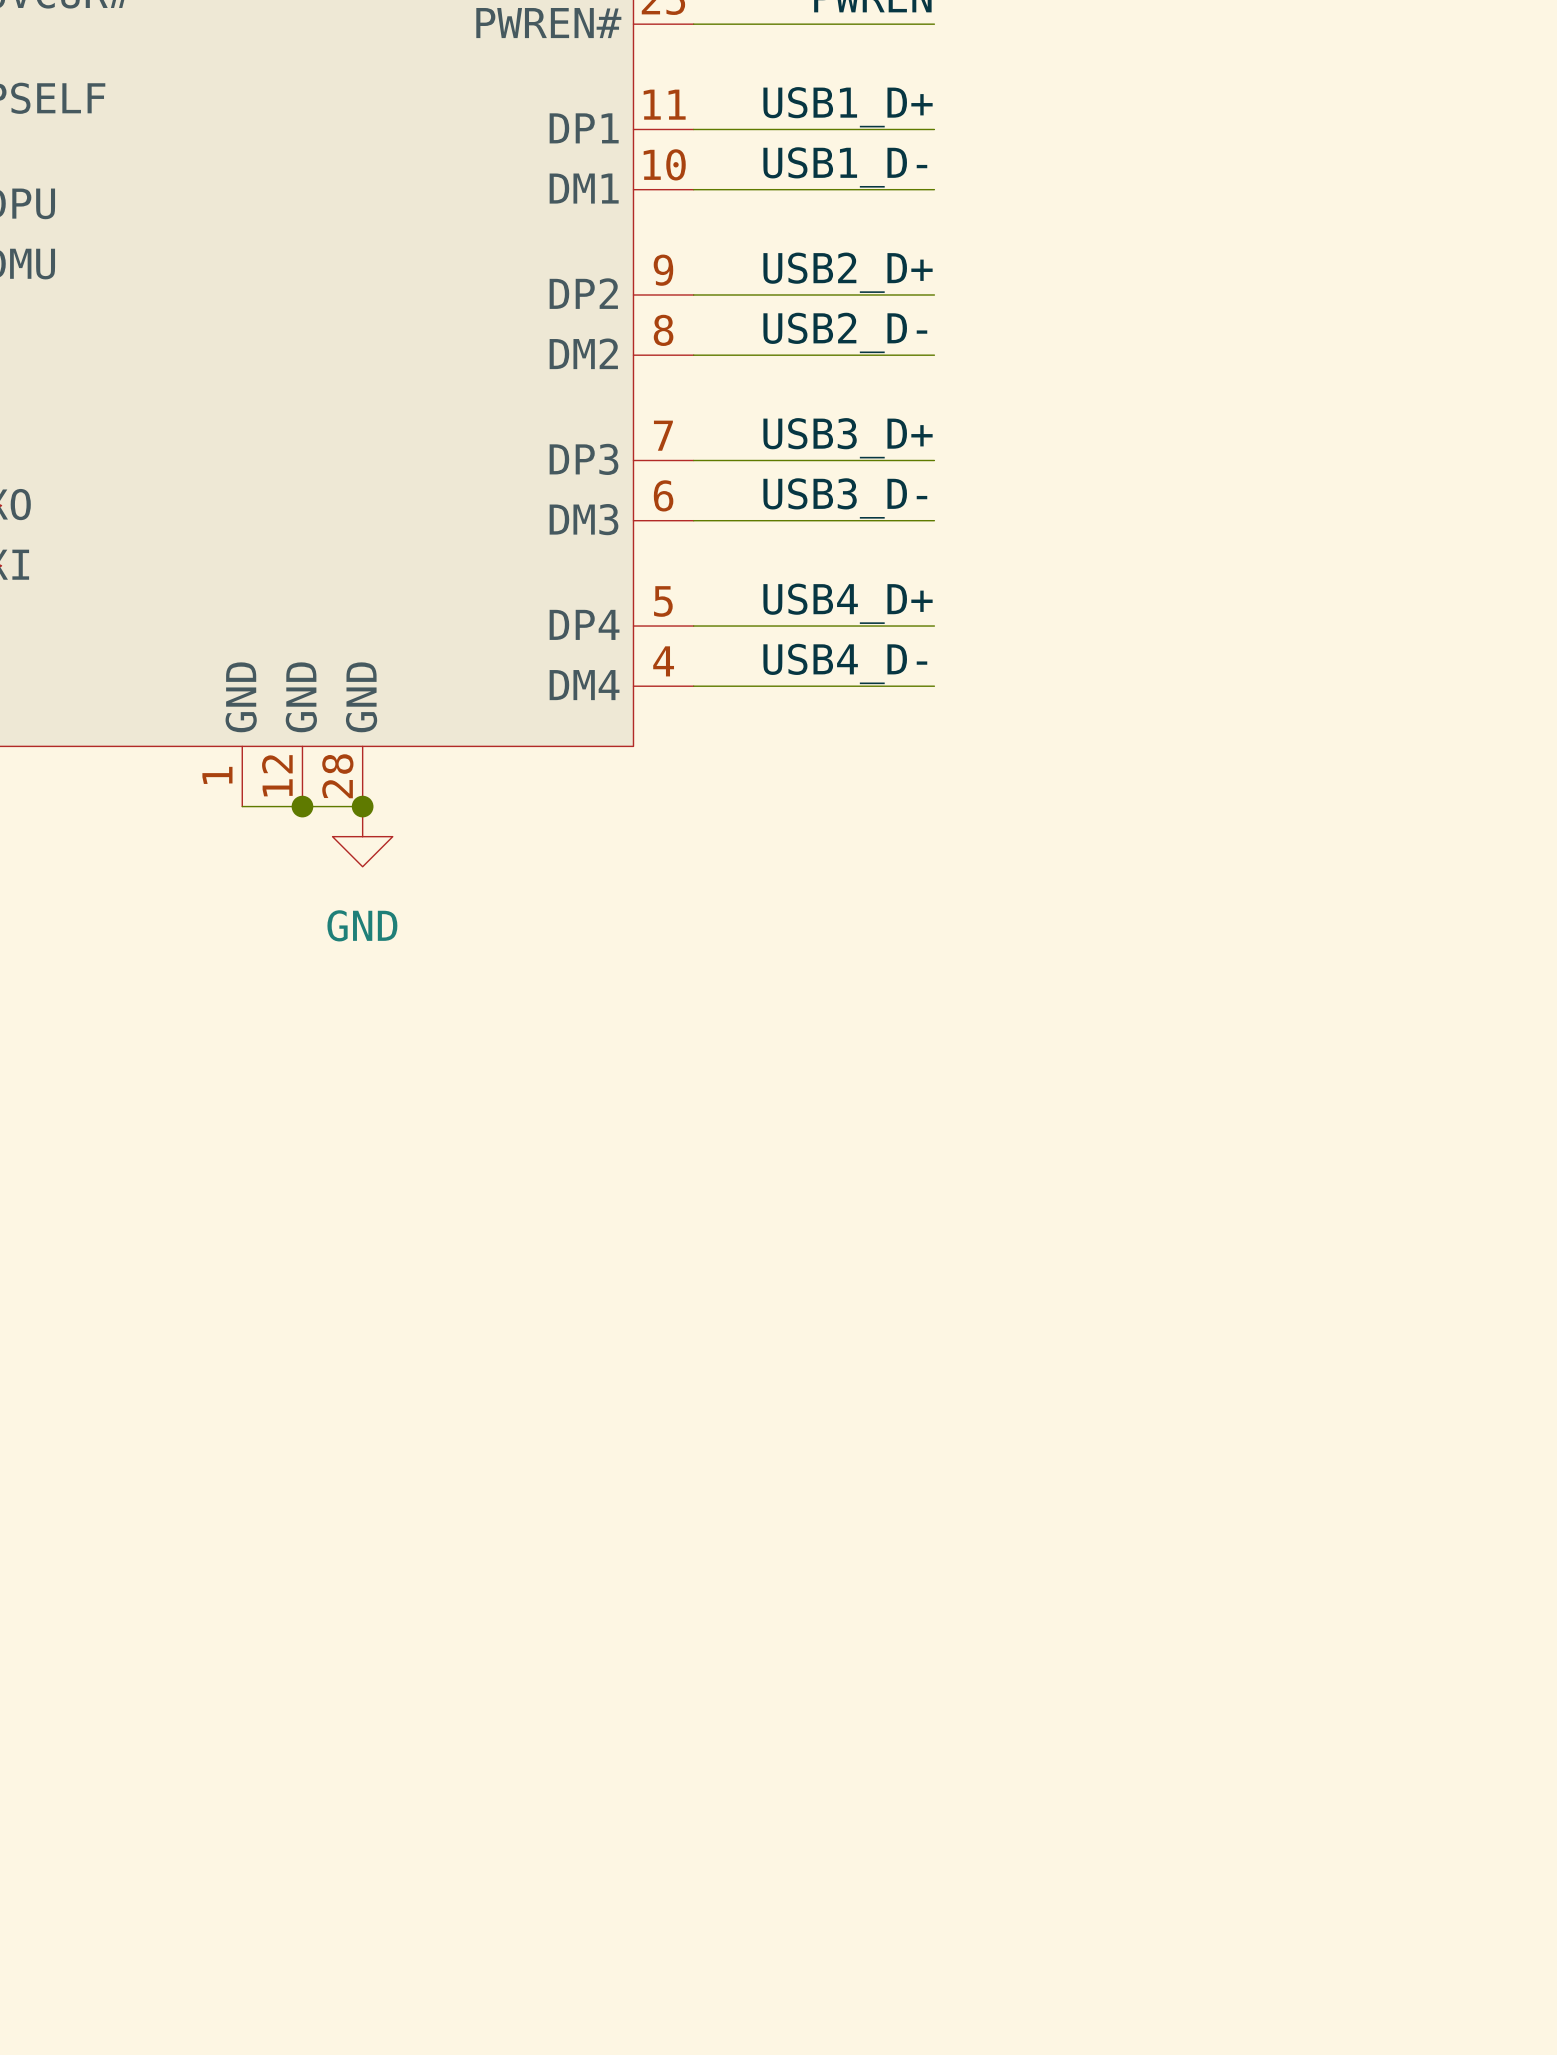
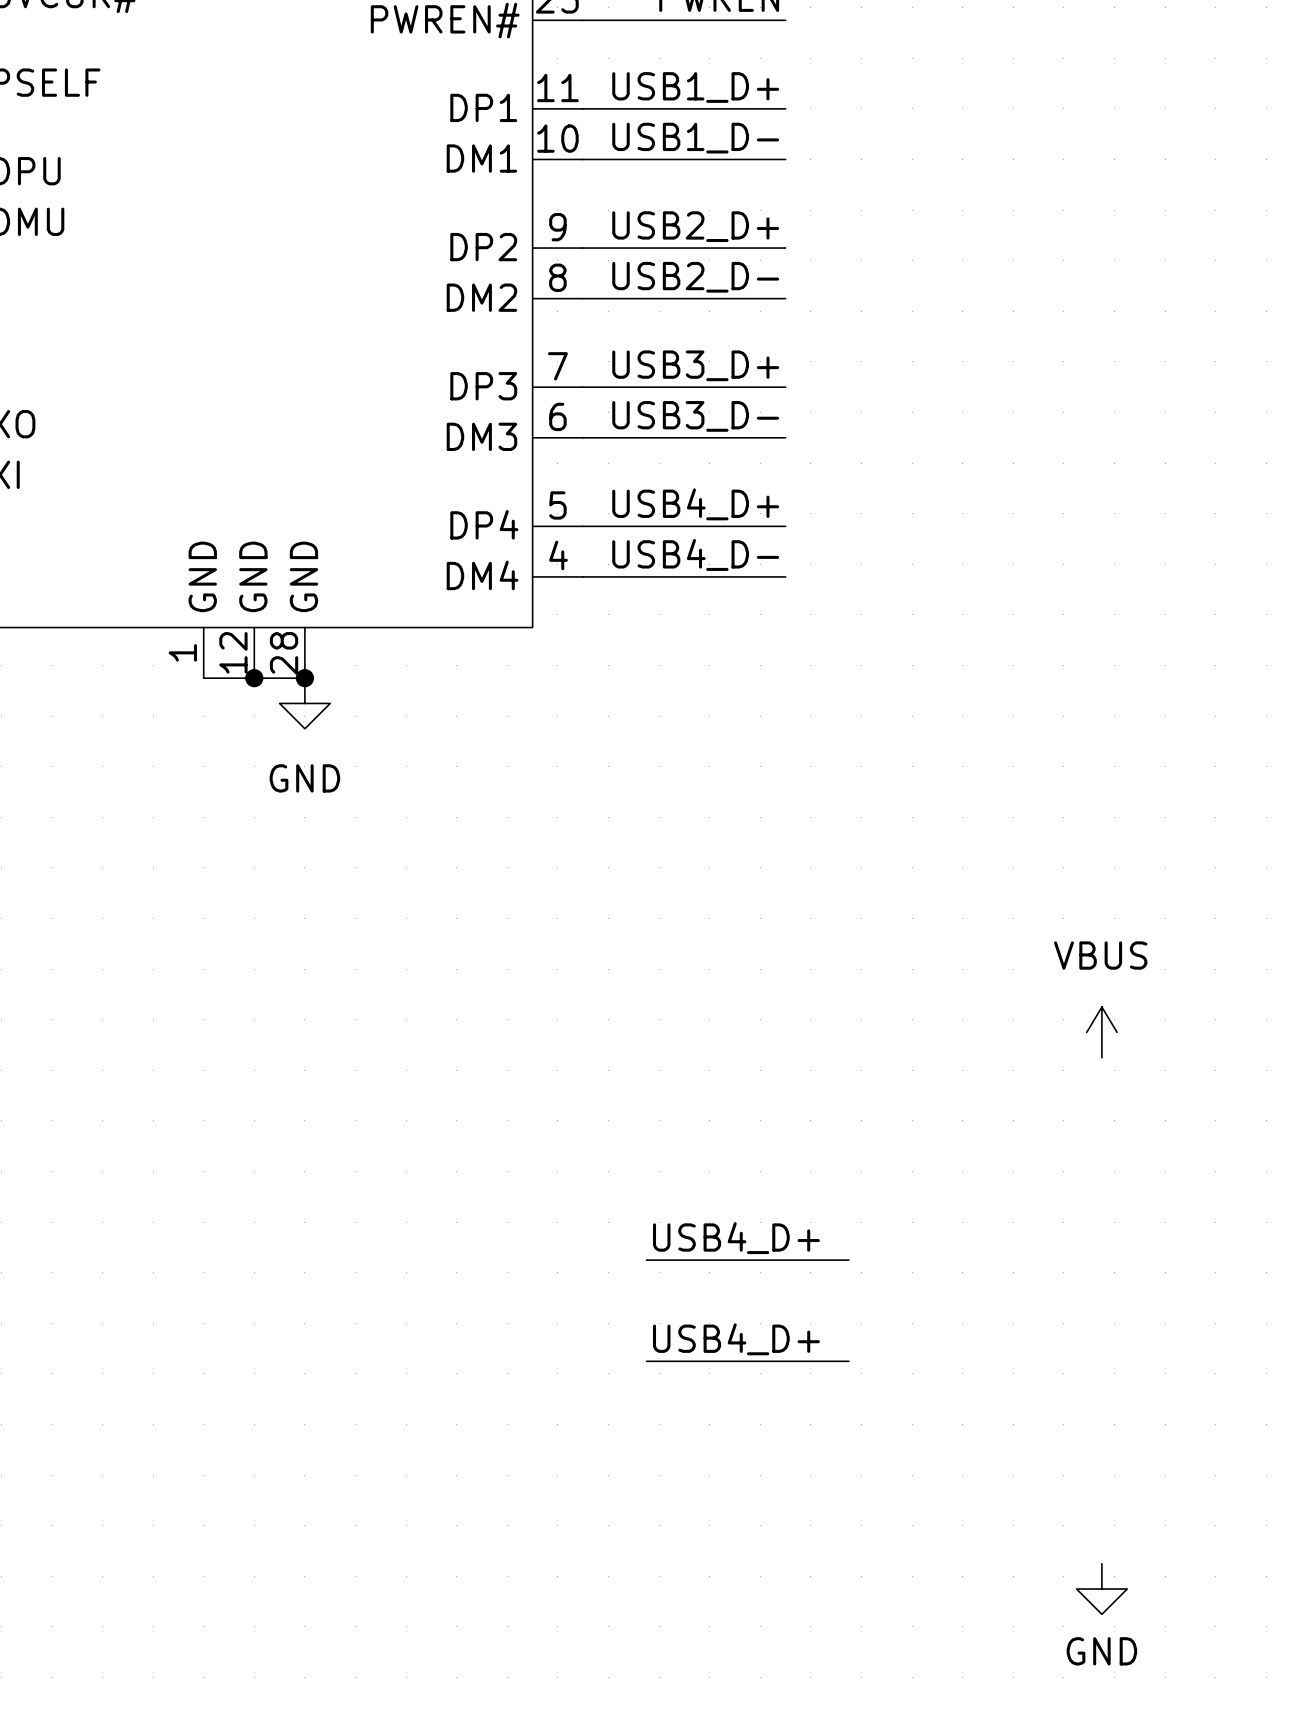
power symbol: none -> VBUS (1101, 1032)
label: none -> USB4_D+ (736, 1238)
wire: none -> (646, 1260) (848, 1260)
label: none -> USB4_D+ (736, 1339)
wire: none -> (646, 1361) (848, 1361)
power symbol: none -> GND (1101, 1589)

